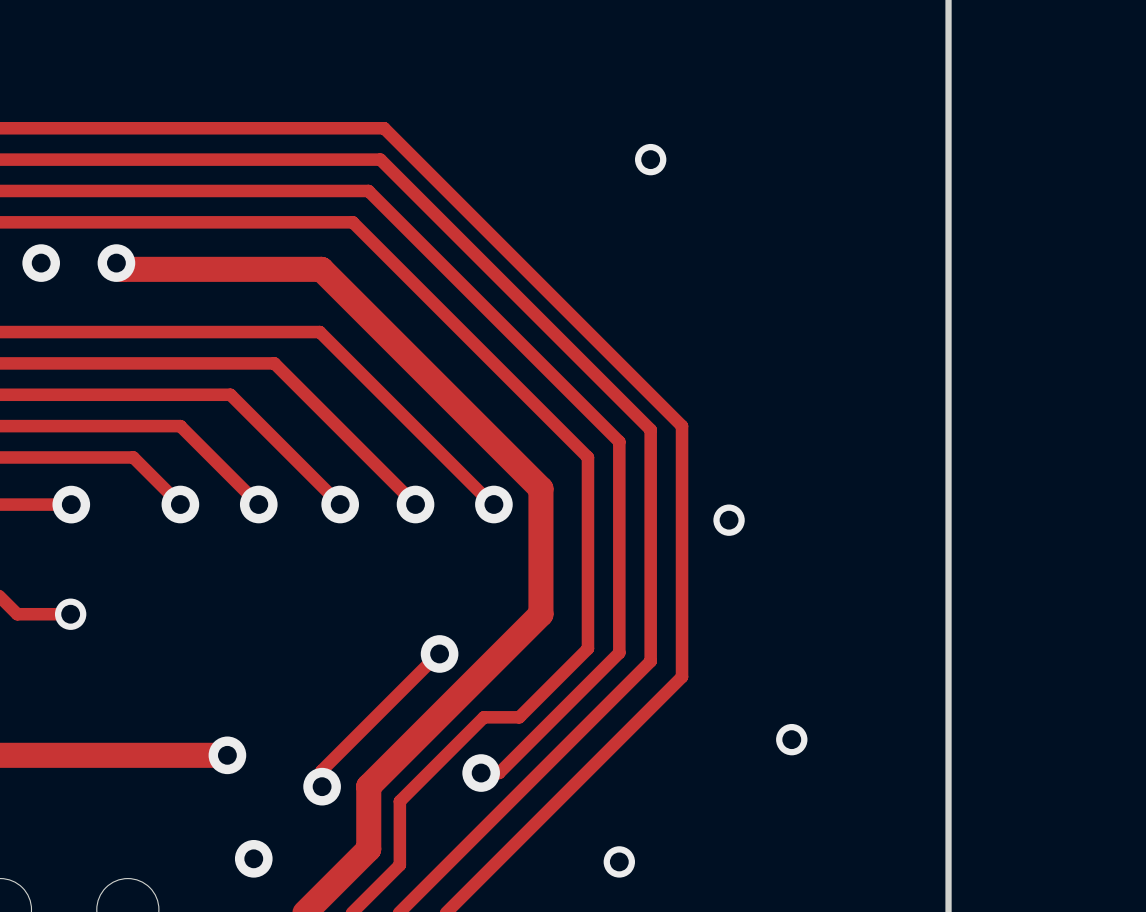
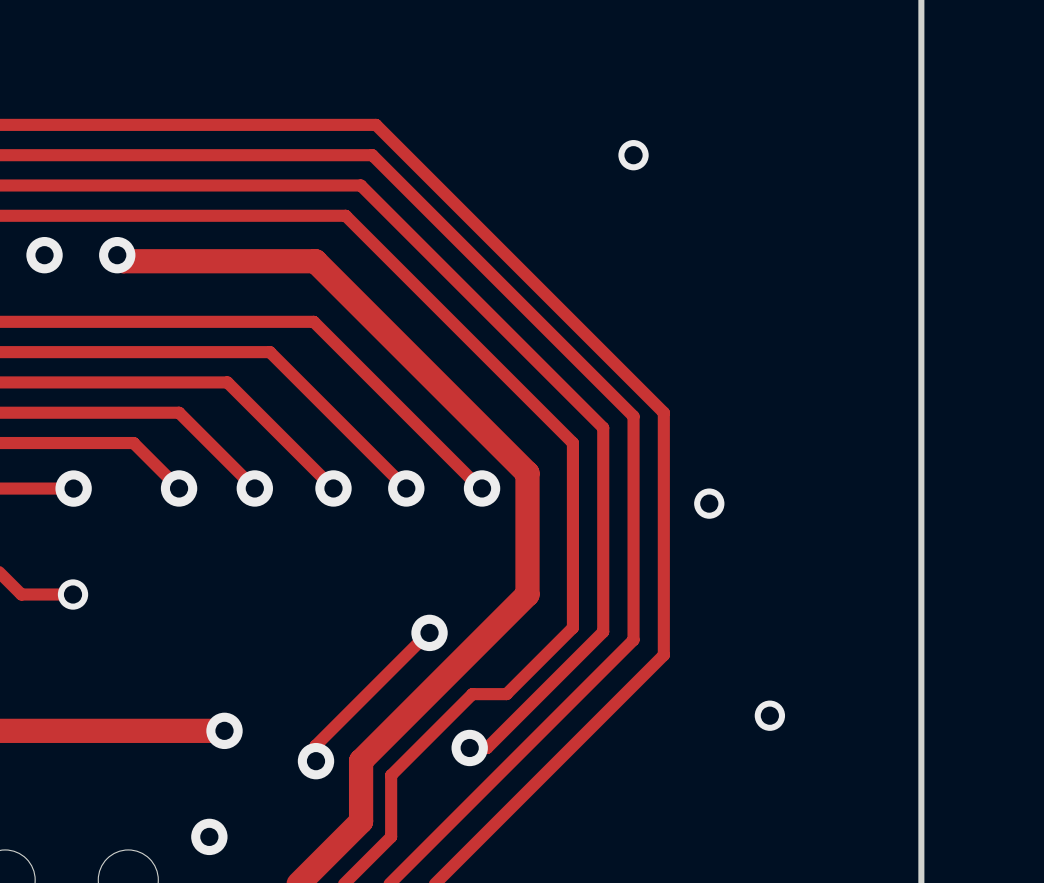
via position: (253, 858) -> (209, 836)
via: (619, 861) -> none

